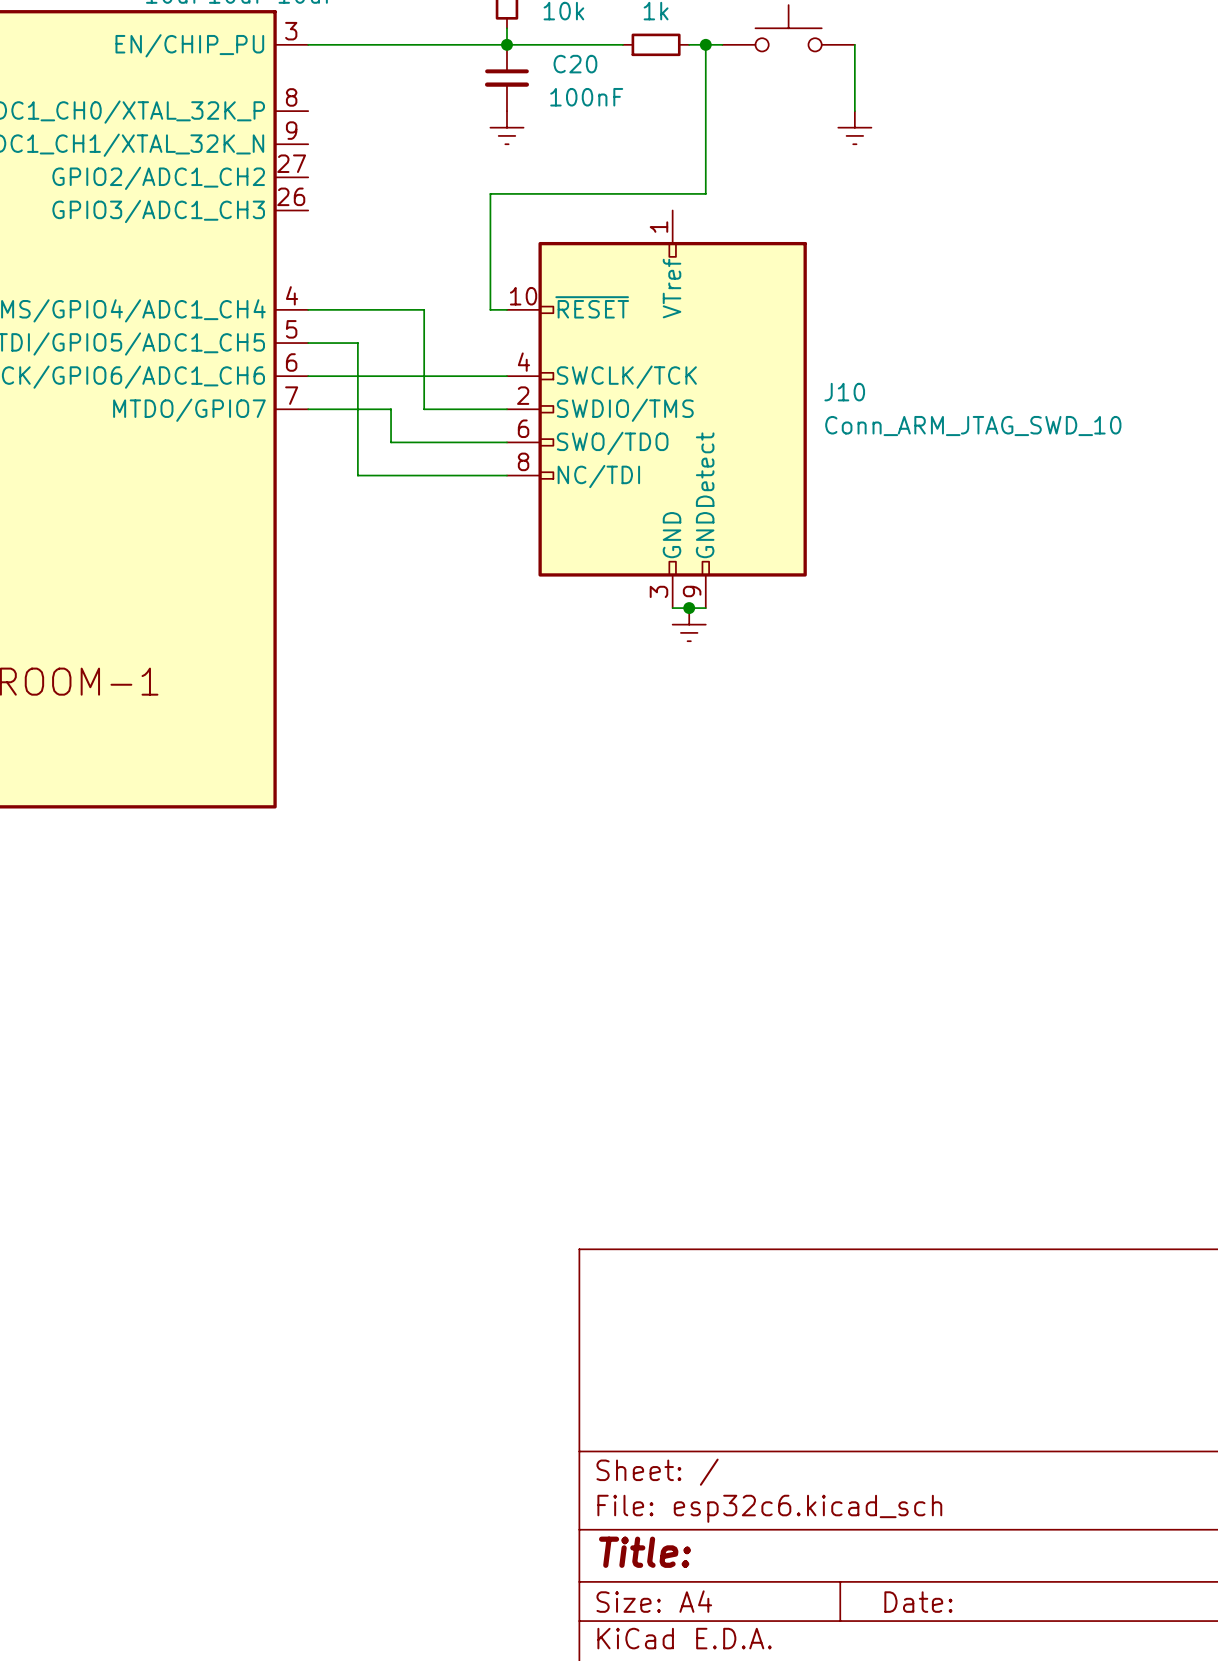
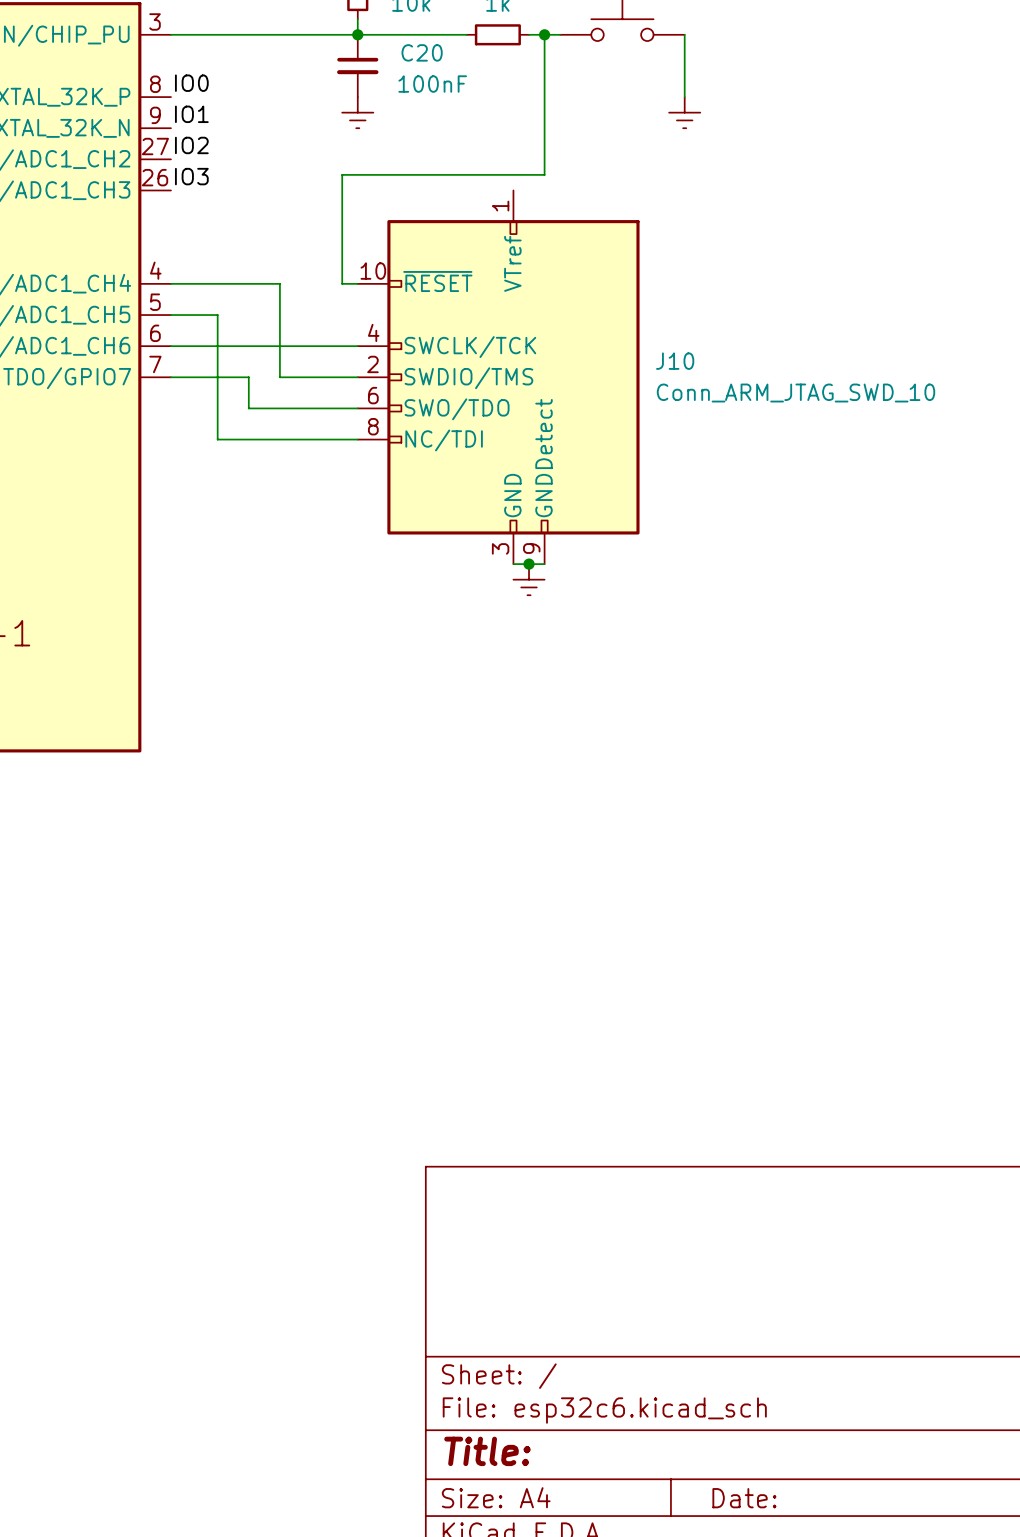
label: none -> IO0 (191, 83)
label: none -> IO1 (191, 114)
label: none -> IO2 (191, 145)
label: none -> IO3 (191, 176)

